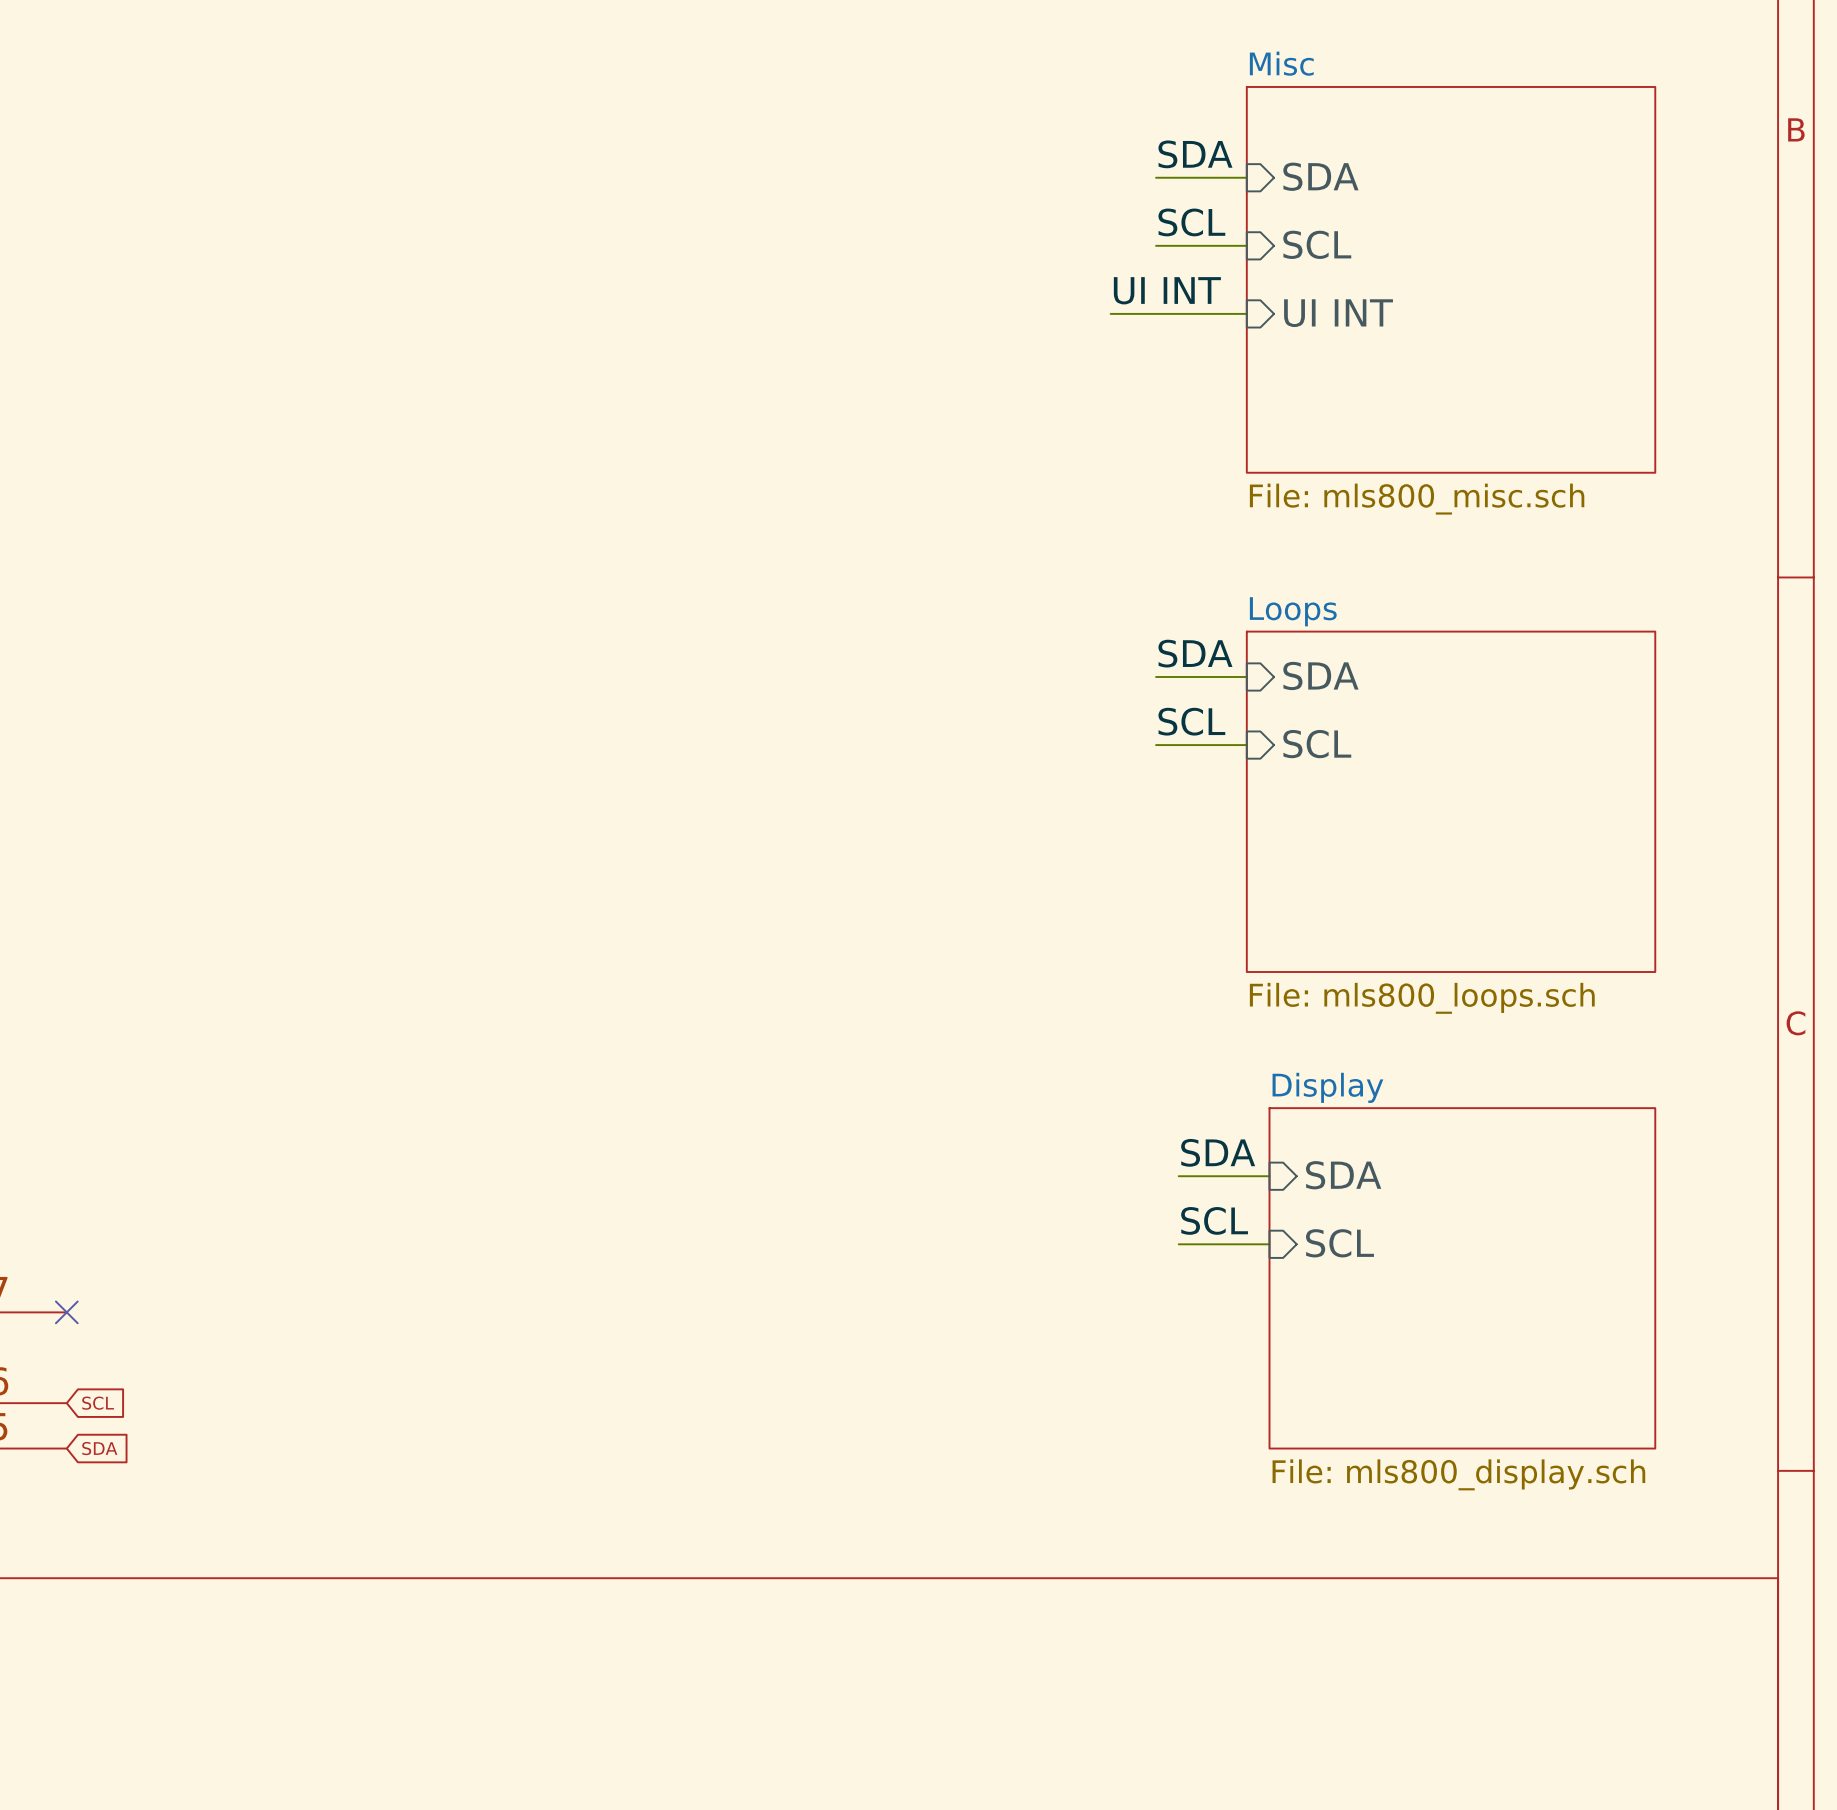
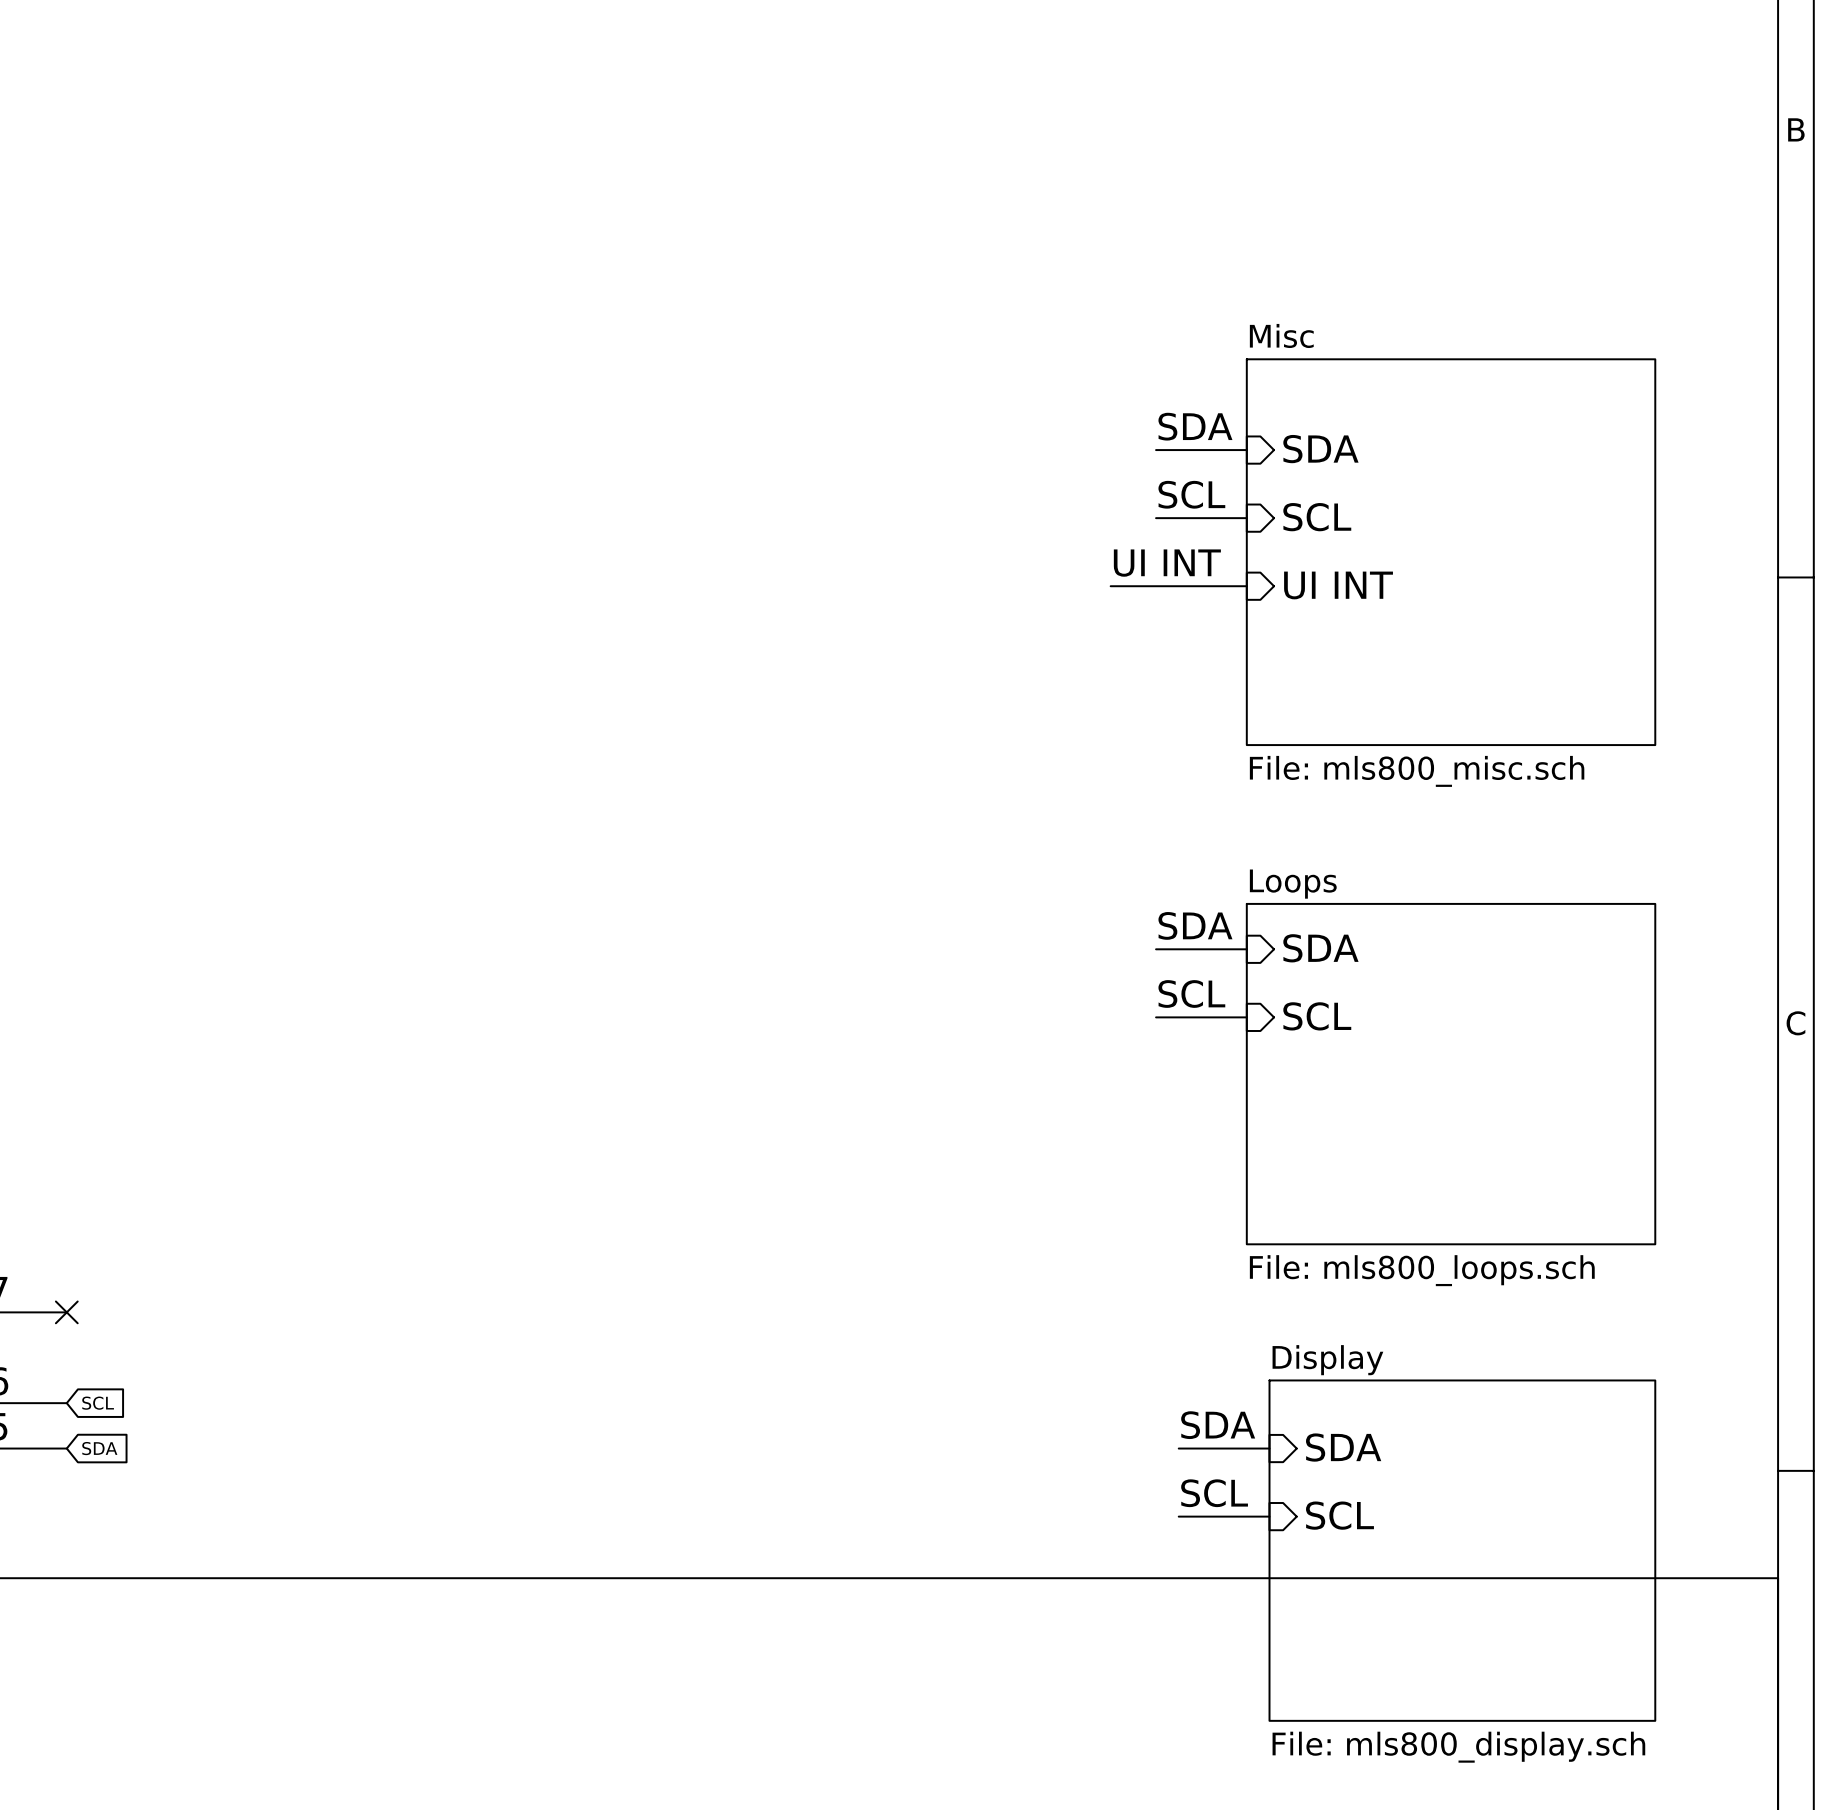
label: SDA (1195, 154) -> none
sheet pin: SDA (1320, 176) -> none
wire: (1156, 177) (1246, 177) -> (1156, 450) (1246, 450)
label: SCL (1191, 222) -> none
sheet pin: SCL (1317, 244) -> none
wire: (1156, 245) (1246, 245) -> (1156, 518) (1246, 518)
sheet Misc position: (1451, 279) -> (1451, 552)
label position: UI INT (1167, 290) -> UI INT (1167, 563)
wire: (1110, 313) (1246, 313) -> (1110, 586) (1246, 586)
sheet pin position: UI INT (1338, 313) -> UI INT (1338, 585)
label: none -> SDA (1195, 426)
sheet pin: none -> SDA (1320, 449)
label: none -> SCL (1191, 494)
sheet pin: none -> SCL (1317, 517)
label: SDA (1195, 653) -> none
sheet pin: SDA (1320, 675) -> none
wire: (1156, 676) (1246, 676) -> (1156, 949) (1246, 949)
label: SCL (1191, 721) -> none
sheet pin: SCL (1317, 744) -> none
wire: (1156, 745) (1246, 745) -> (1156, 1017) (1246, 1017)
sheet Loops position: (1451, 801) -> (1451, 1074)
label: none -> SDA (1195, 925)
sheet pin: none -> SDA (1320, 948)
label: none -> SCL (1191, 993)
sheet pin: none -> SCL (1317, 1016)
label: SDA (1218, 1152) -> none
sheet pin: SDA (1343, 1175) -> none
wire: (1178, 1176) (1269, 1176) -> (1178, 1448) (1269, 1448)
label: SCL (1214, 1220) -> none
sheet pin: SCL (1339, 1243) -> none
wire: (1178, 1244) (1269, 1244) -> (1178, 1516) (1269, 1516)
sheet Display position: (1462, 1278) -> (1462, 1550)
label: none -> SDA (1218, 1425)
sheet pin: none -> SDA (1343, 1447)
label: none -> SCL (1214, 1493)
sheet pin: none -> SCL (1339, 1515)

